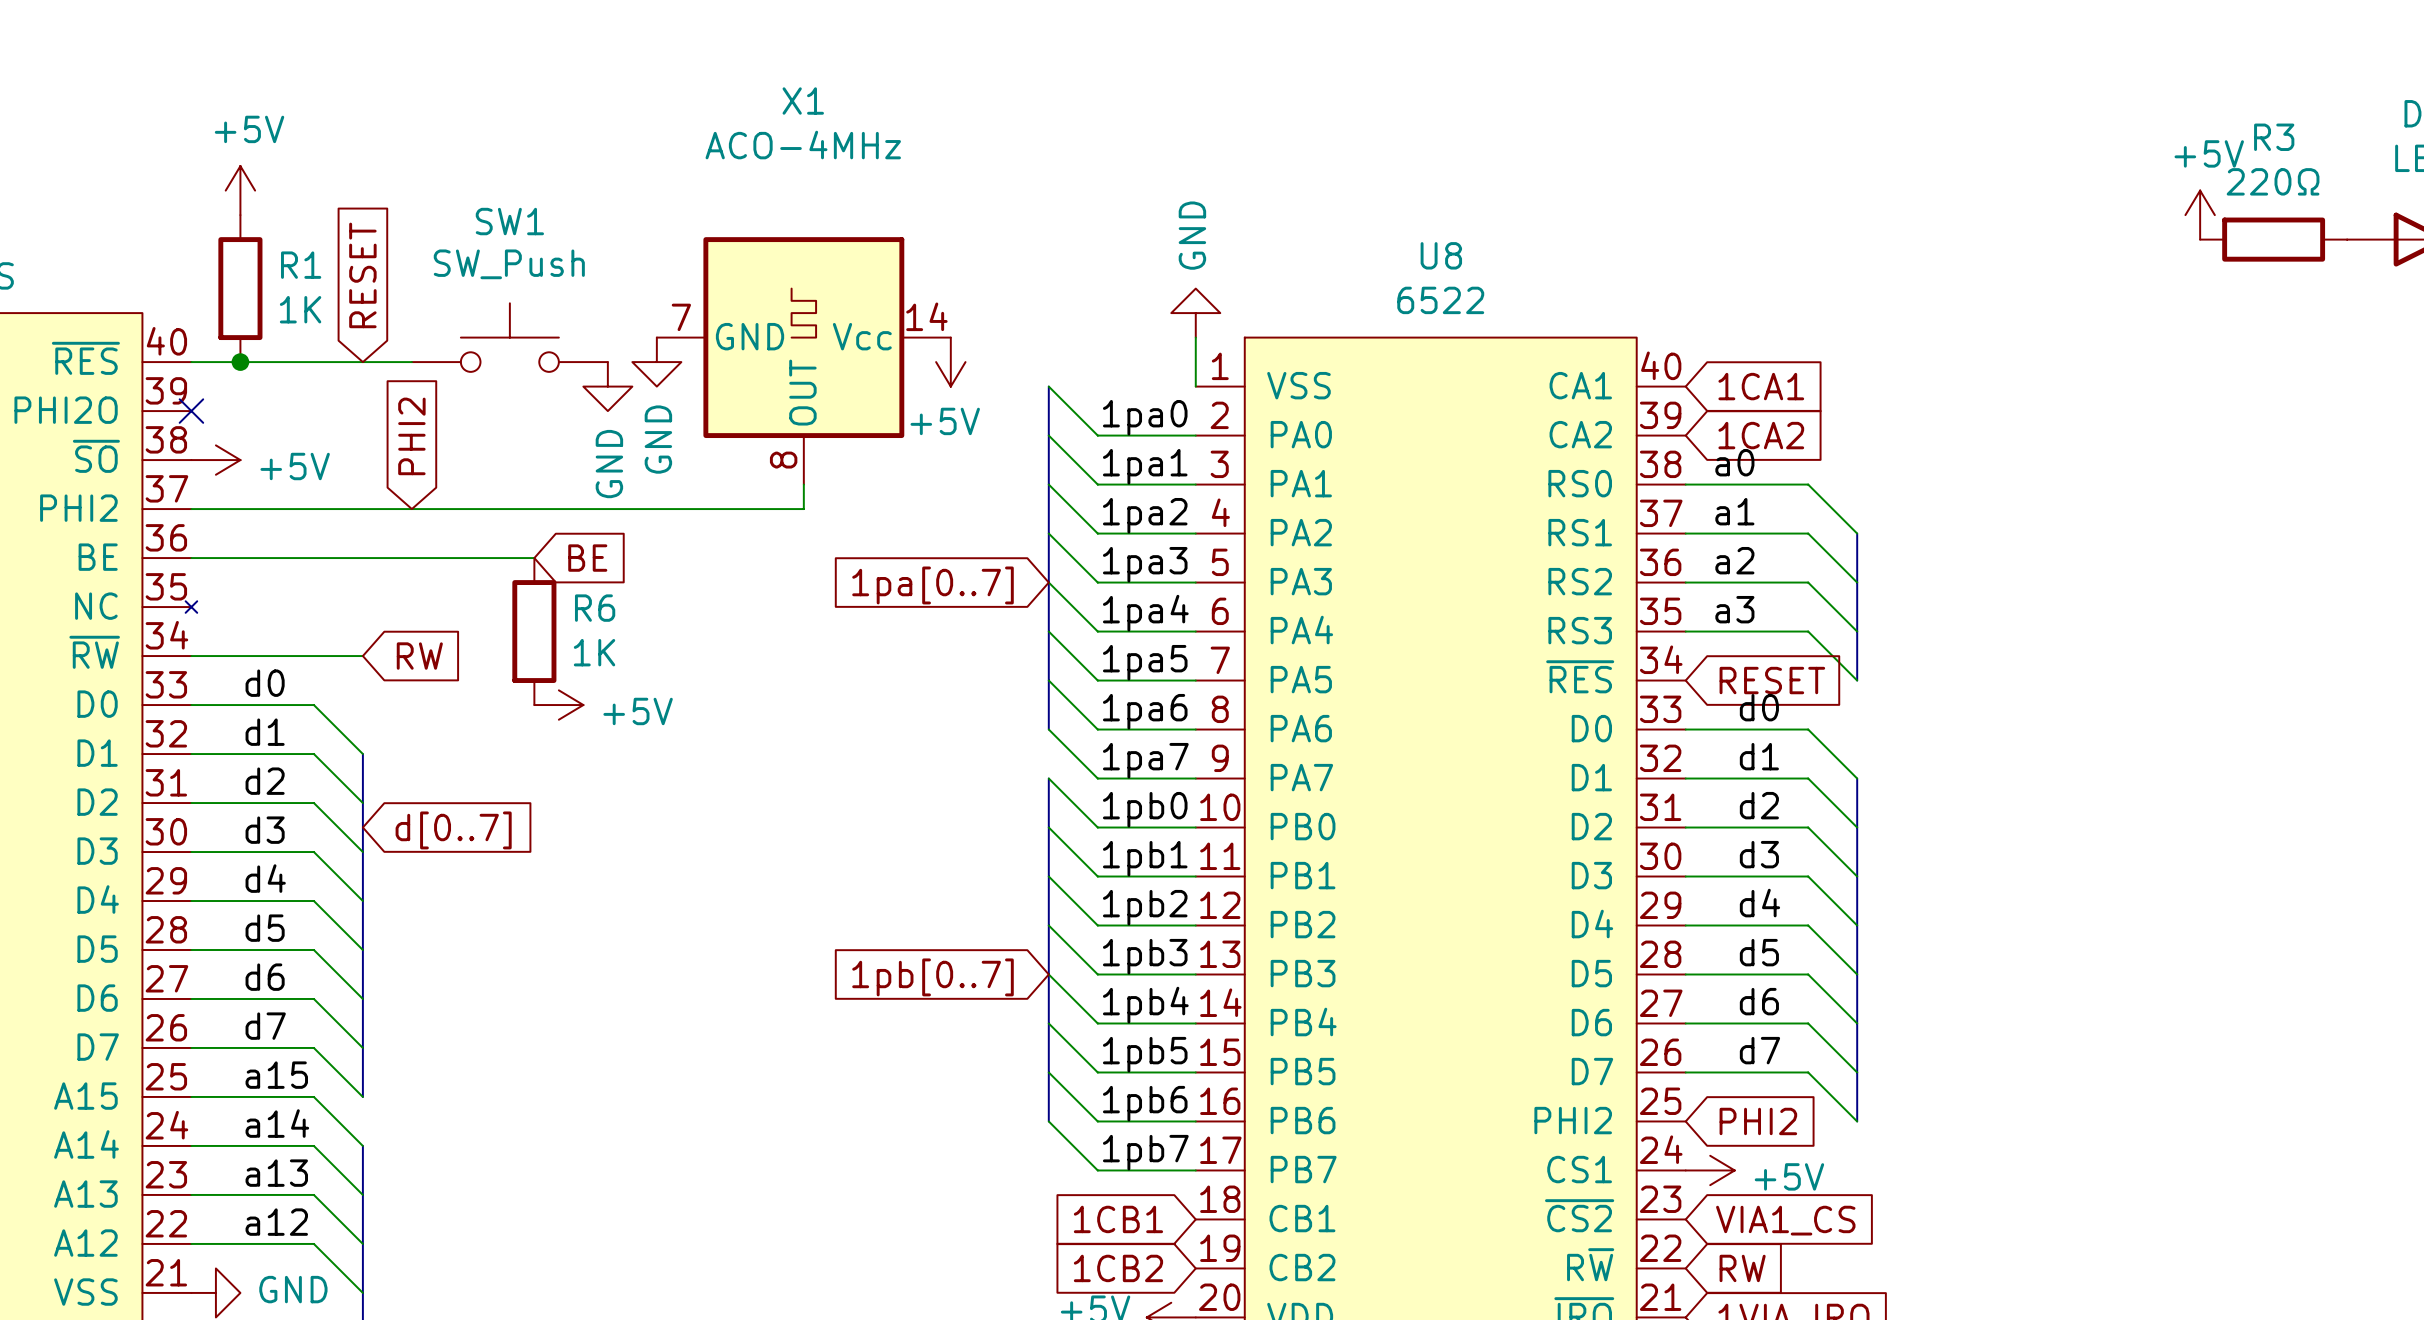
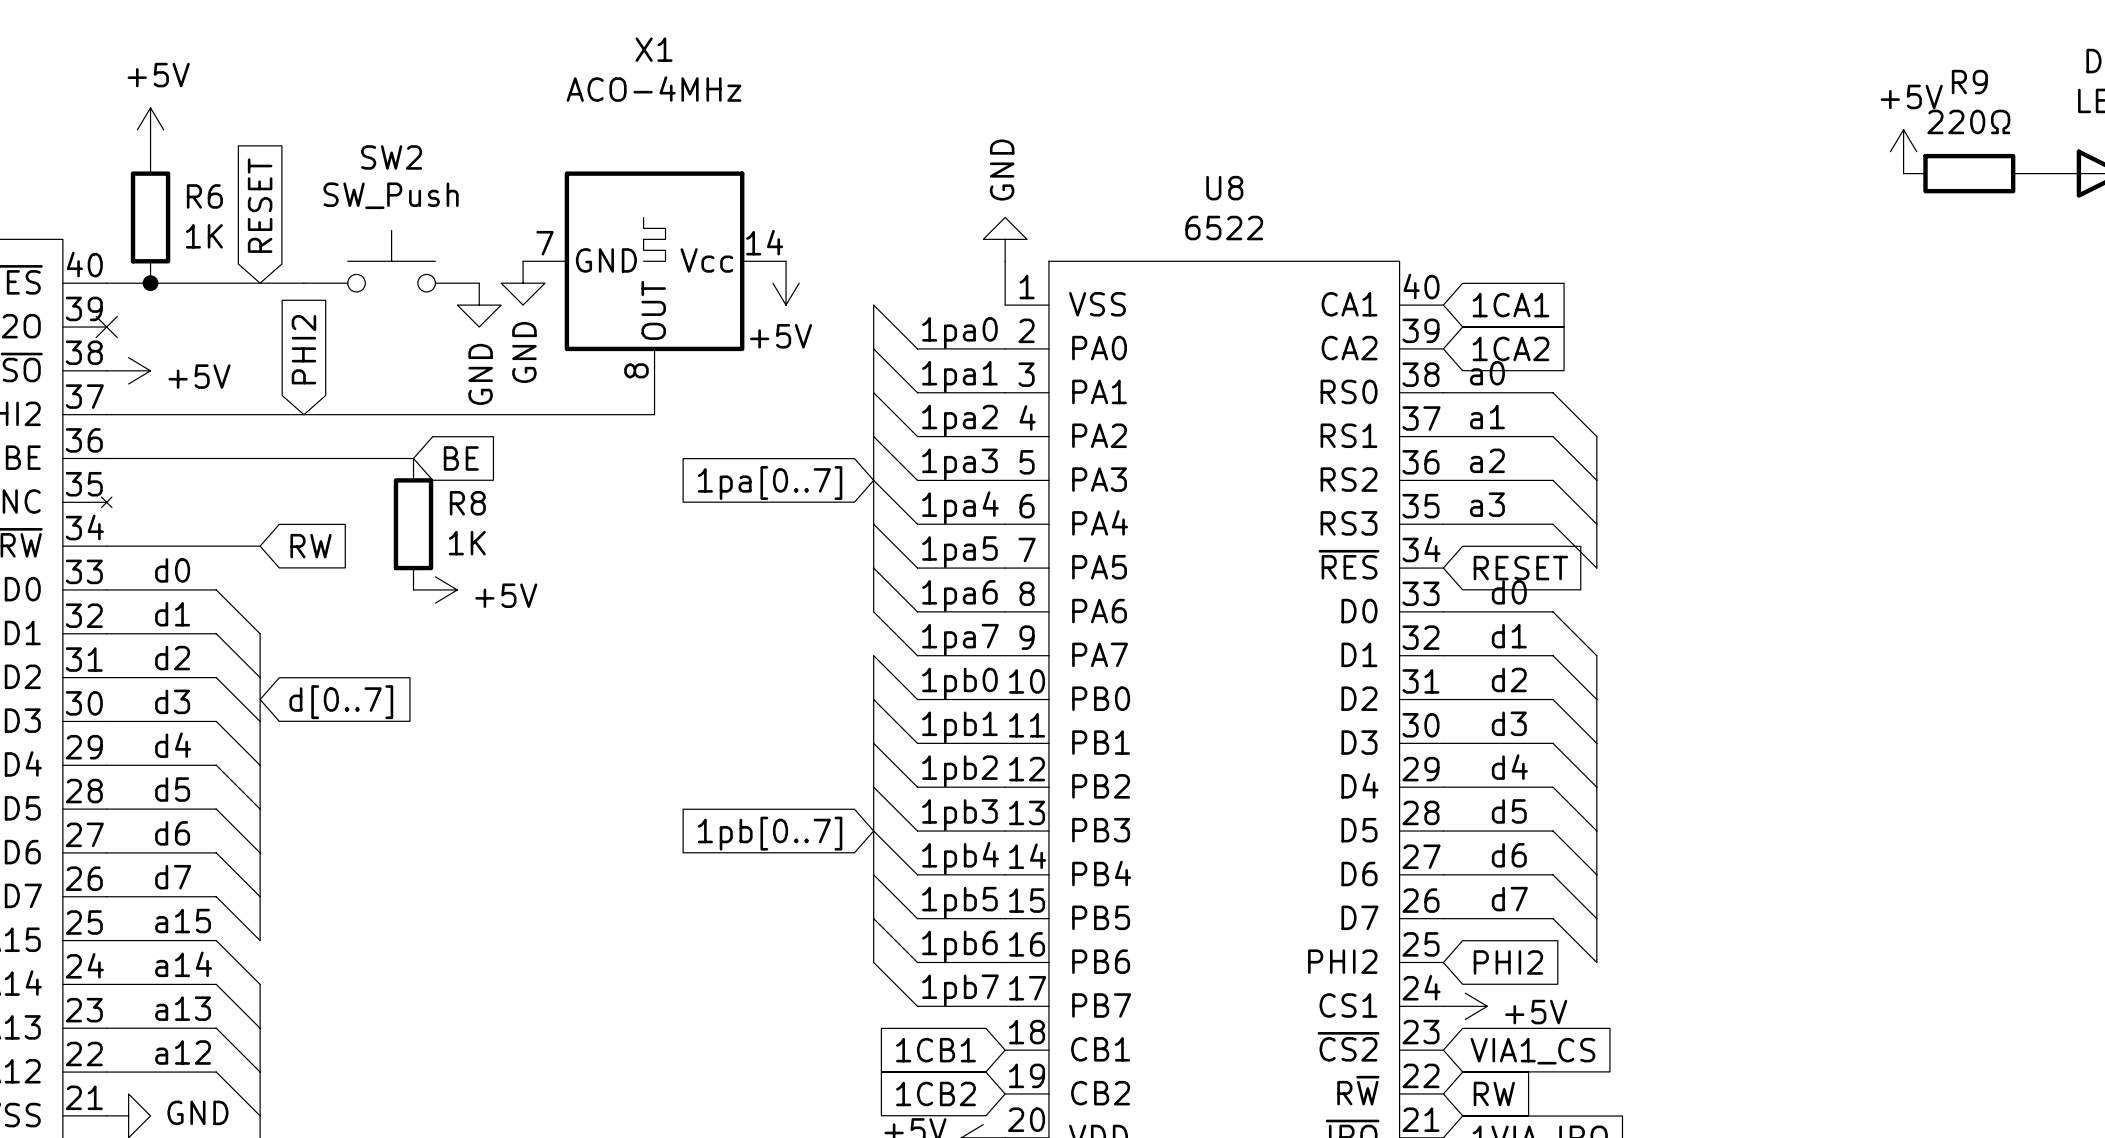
R3 name: R3 (2274, 137) -> R9 (1969, 82)
SW1 name: SW1 (509, 221) -> SW2 (391, 157)
R1 name: R1 (301, 265) -> R6 (204, 196)
R6 name: R6 (595, 608) -> R8 (467, 503)

